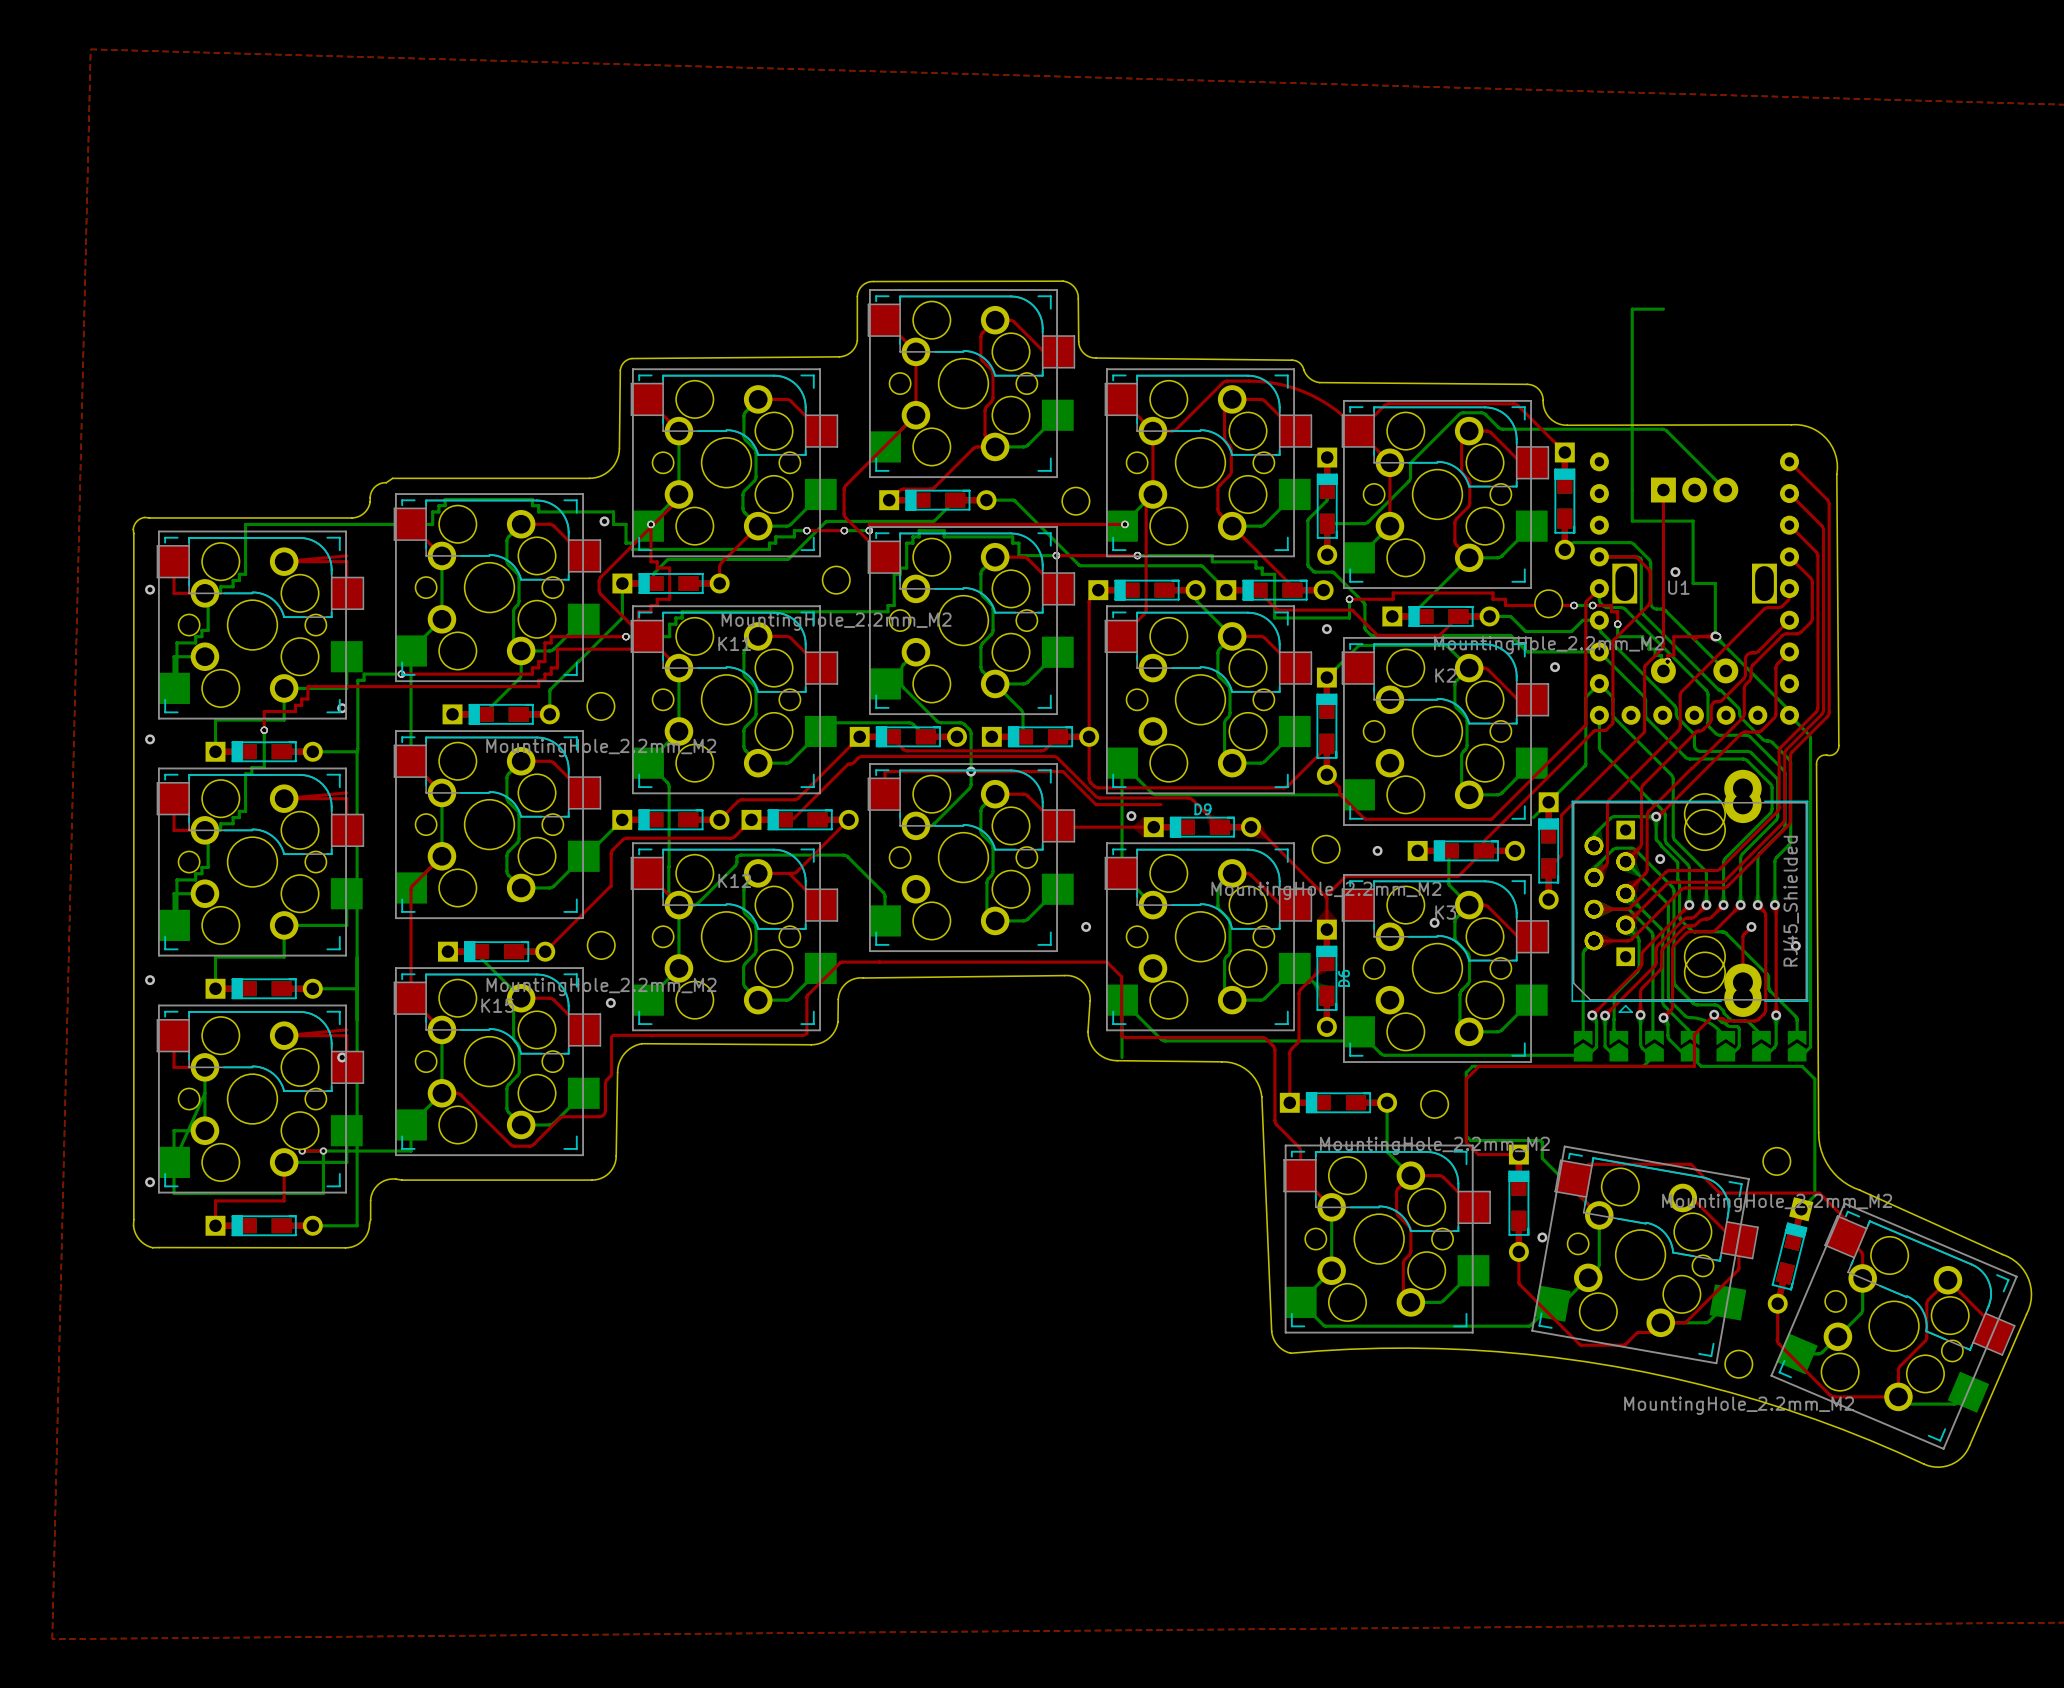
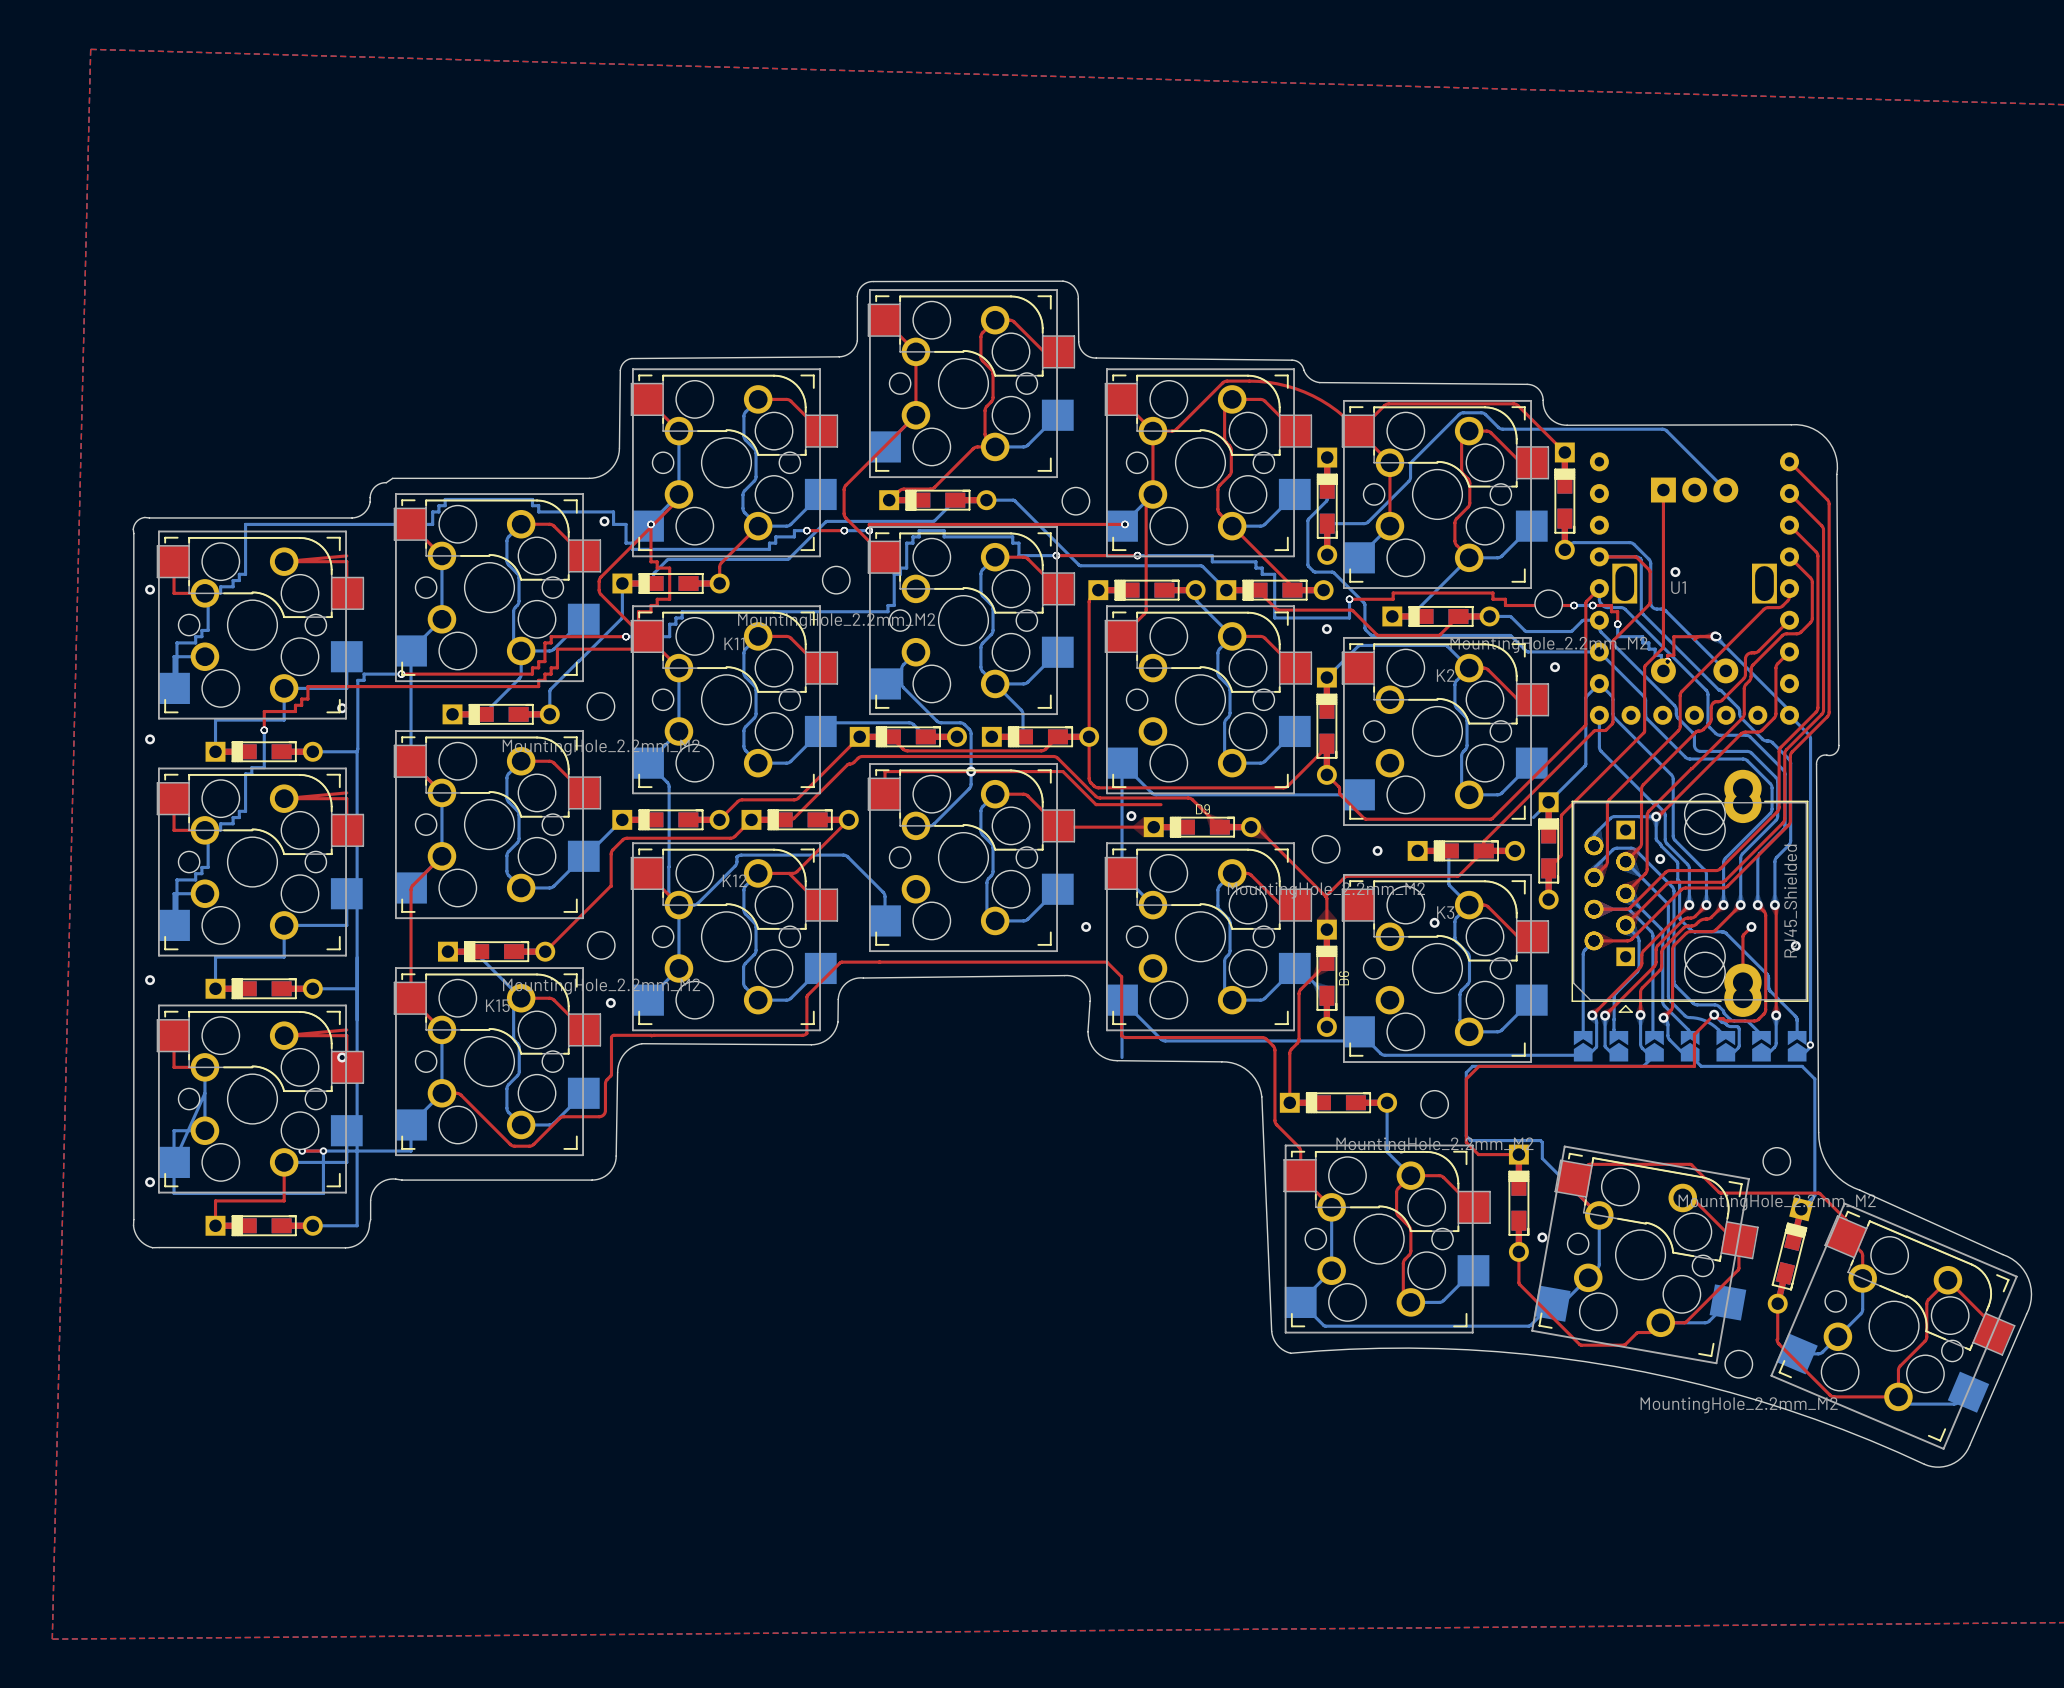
bottom track: (1663, 309) (1632, 309) (1632, 521) (1693, 521) (1693, 583) (1715, 583) (1715, 636) -> none
via: none -> (1810, 1045)

